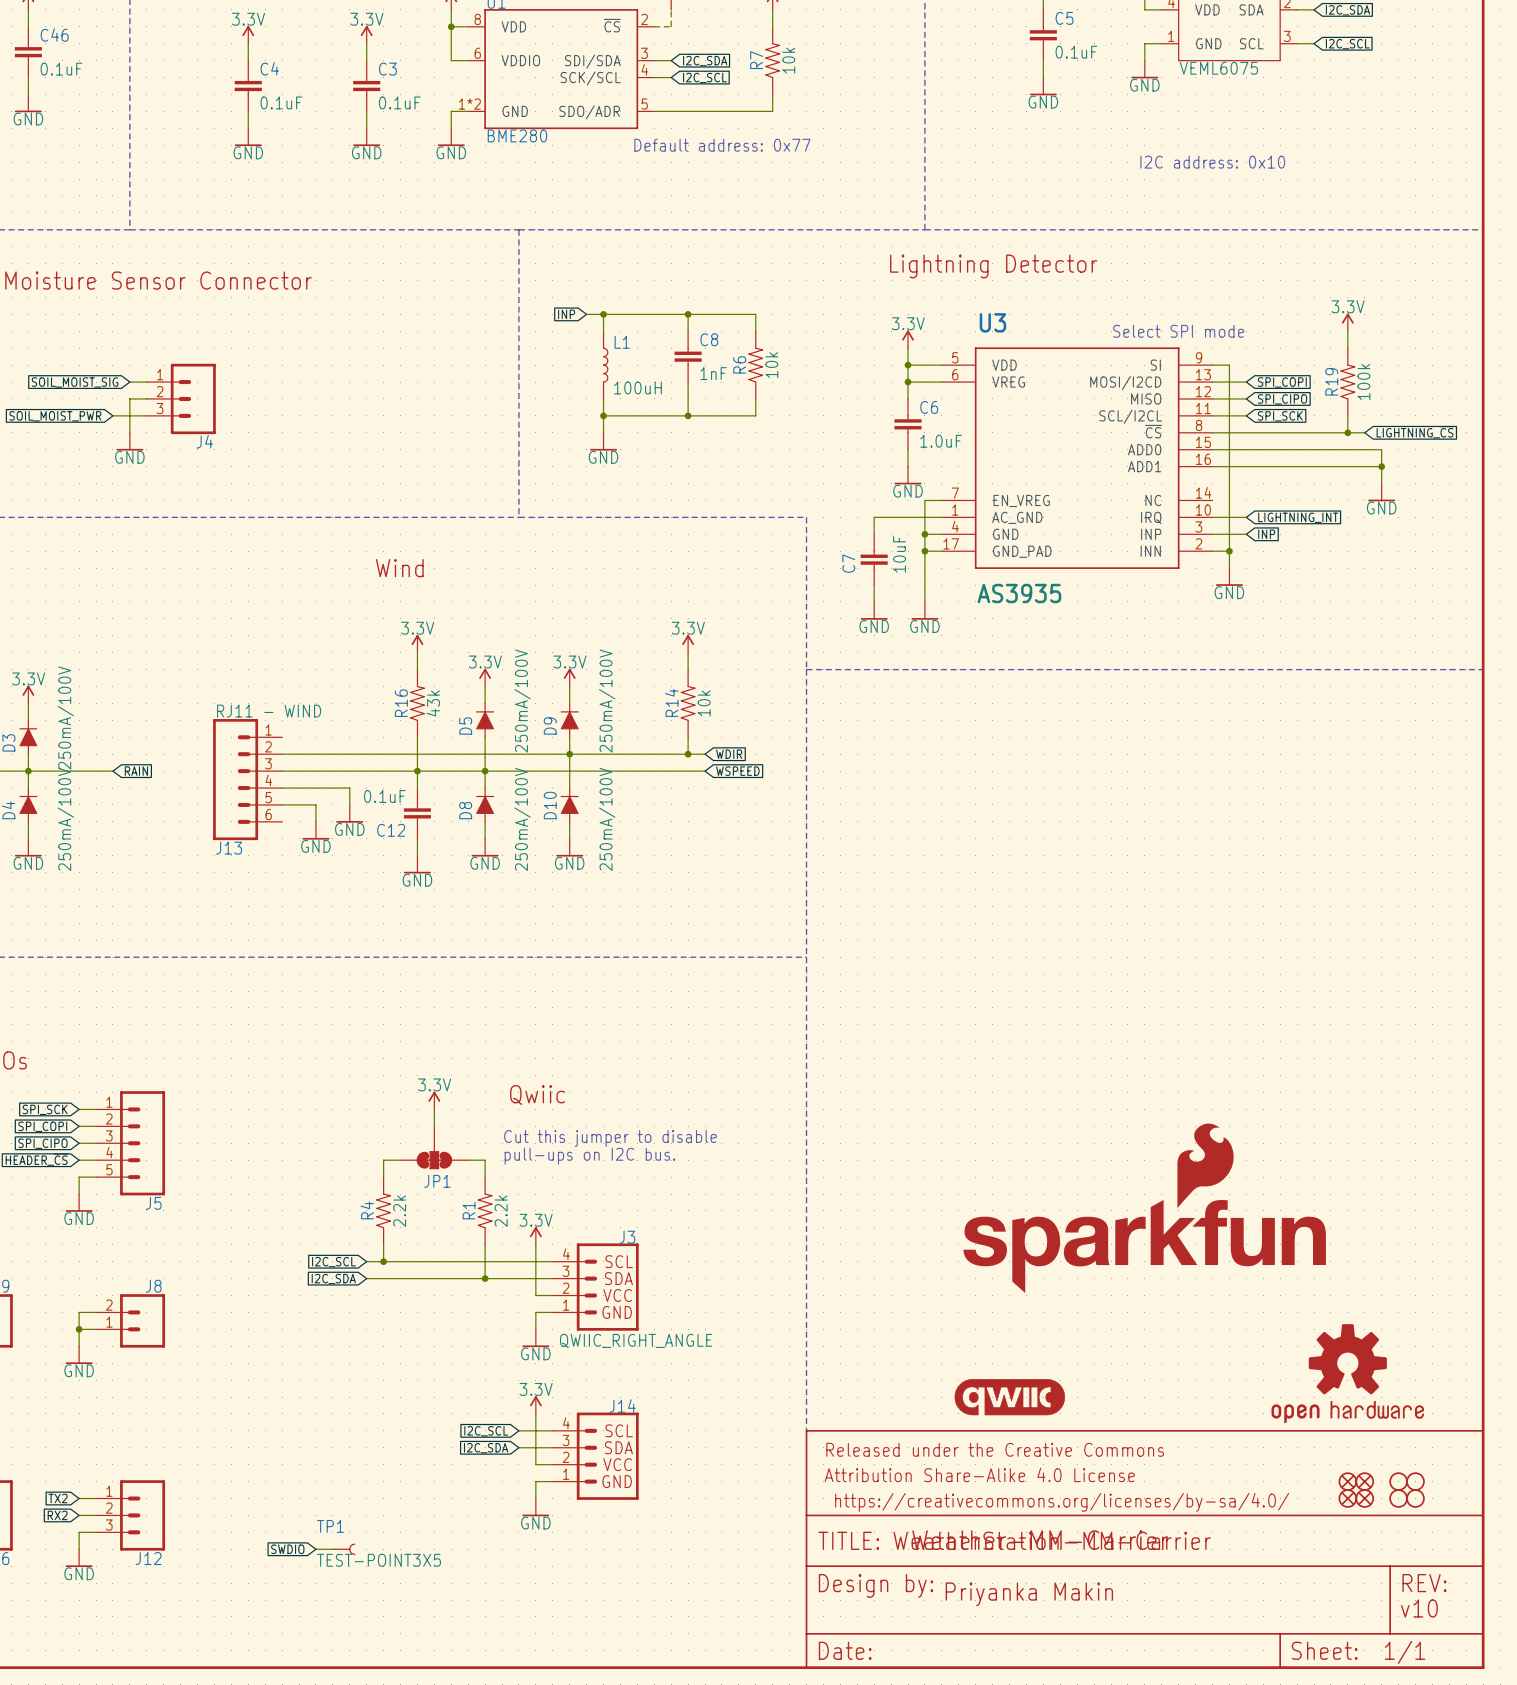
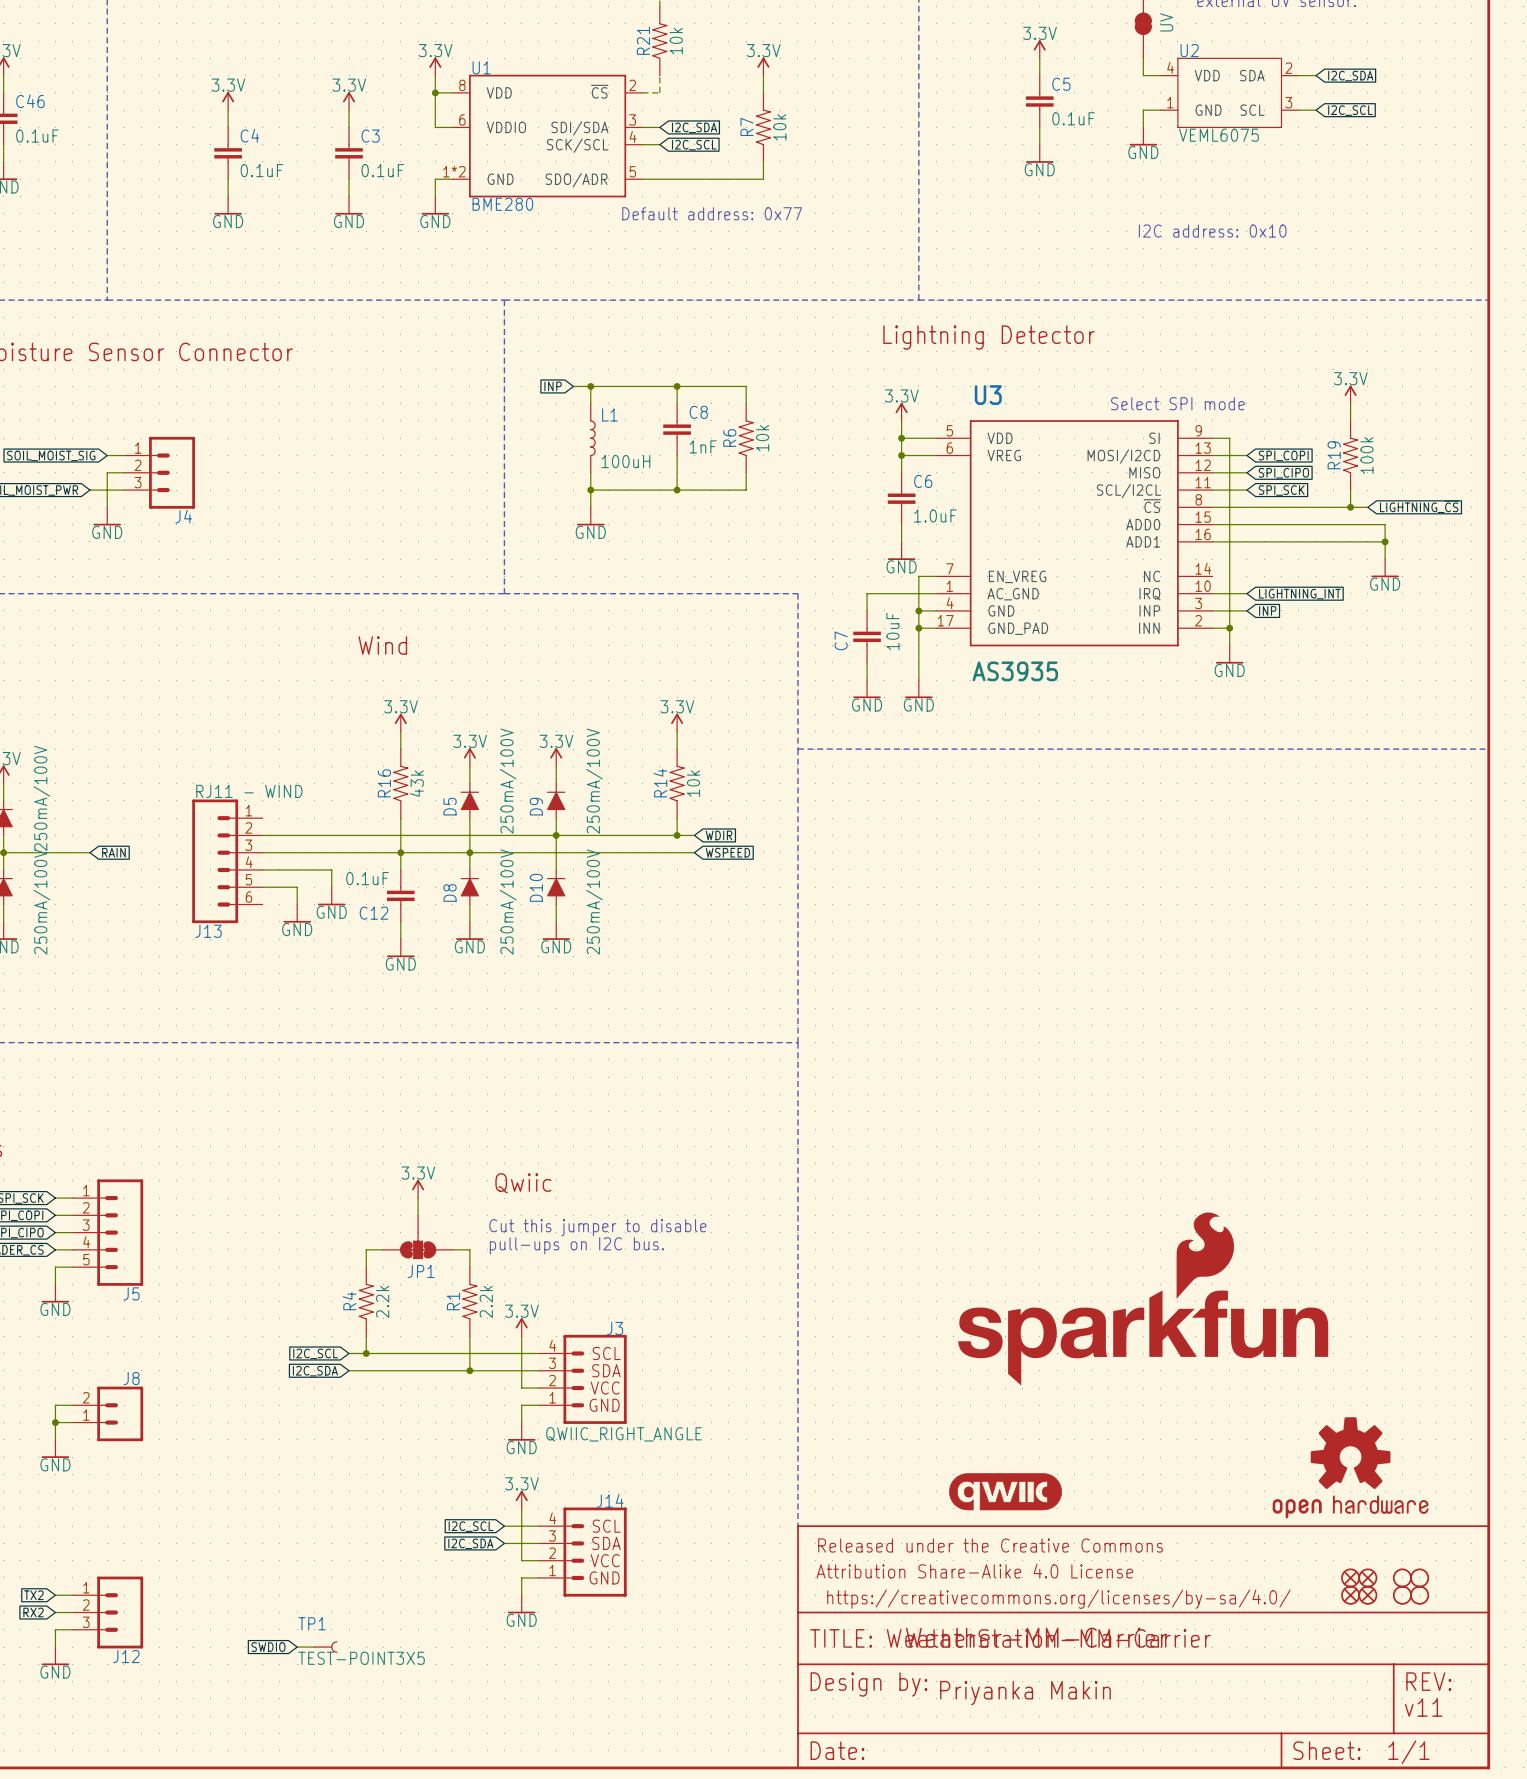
text: v10 (1419, 1608) -> v11 (1423, 1707)

